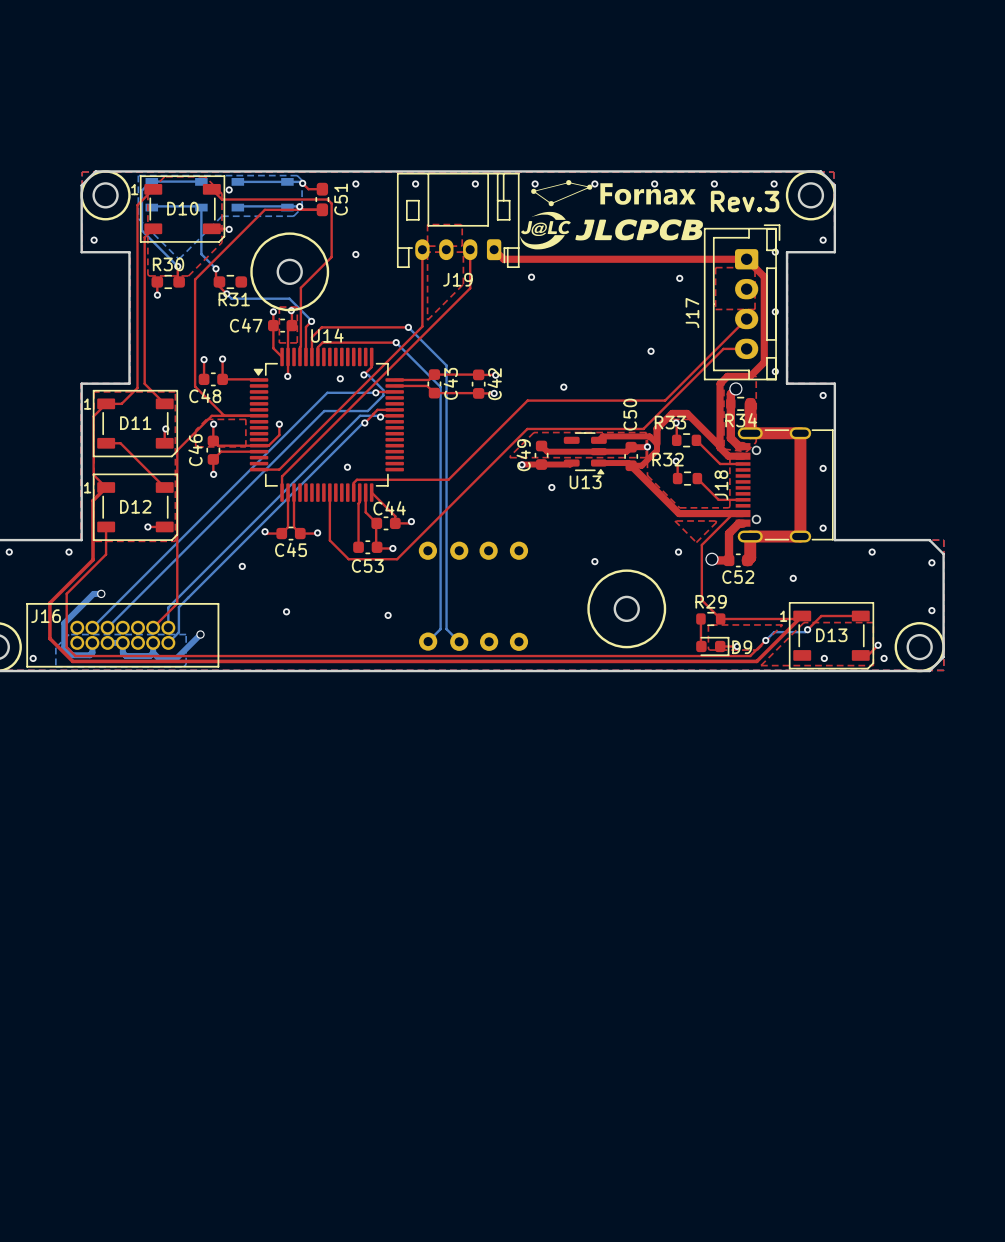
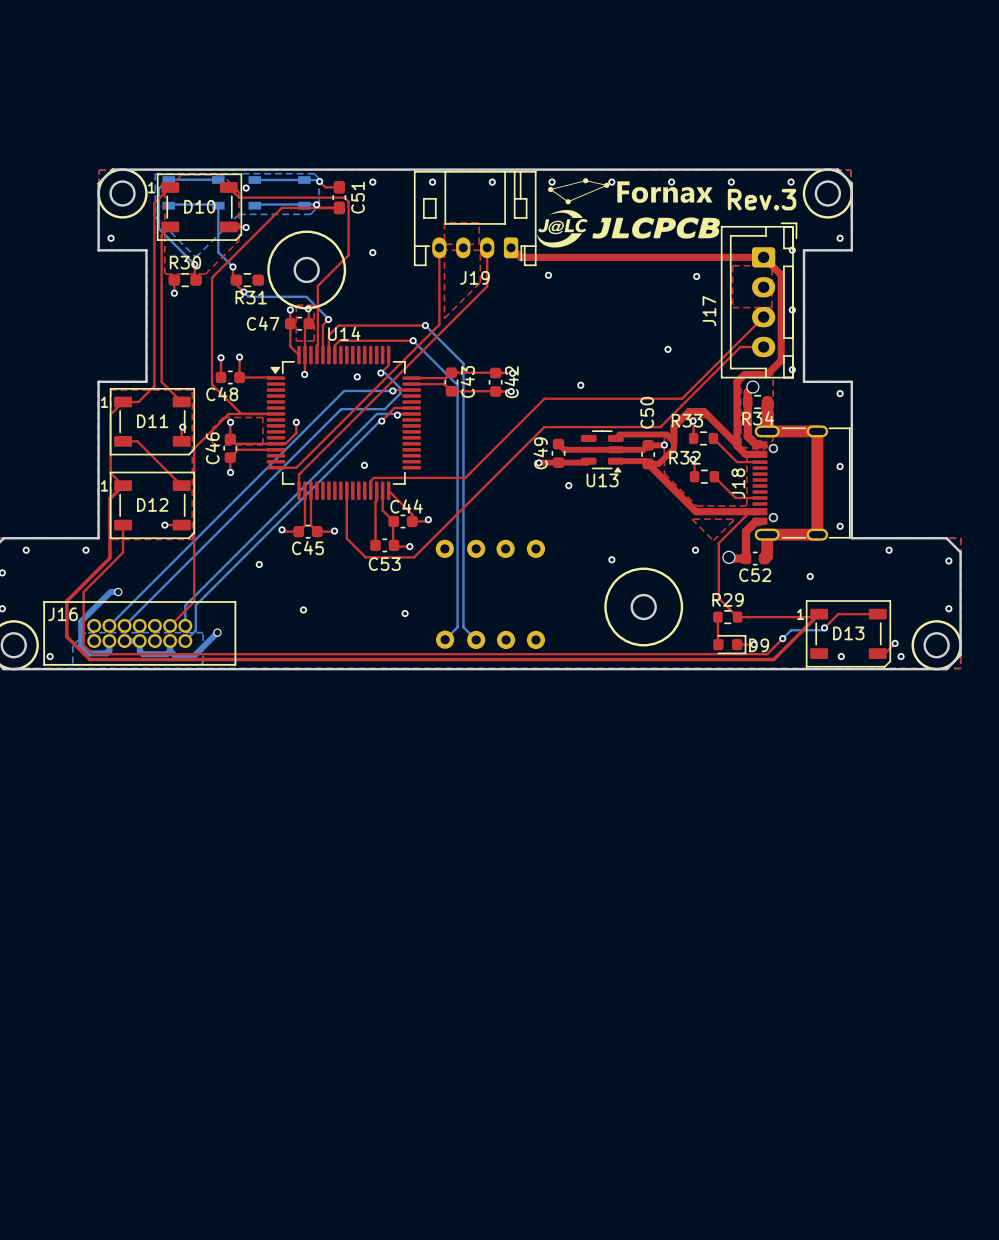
top zone outline: (533, 432) (646, 432) (646, 457) (510, 457) (533, 432) -> none
top zone outline: (804, 622) (760, 665) (873, 665) (873, 622) (804, 622) -> none
top zone outline: (708, 624) (782, 624) (757, 650) (709, 650) (708, 624) -> none

